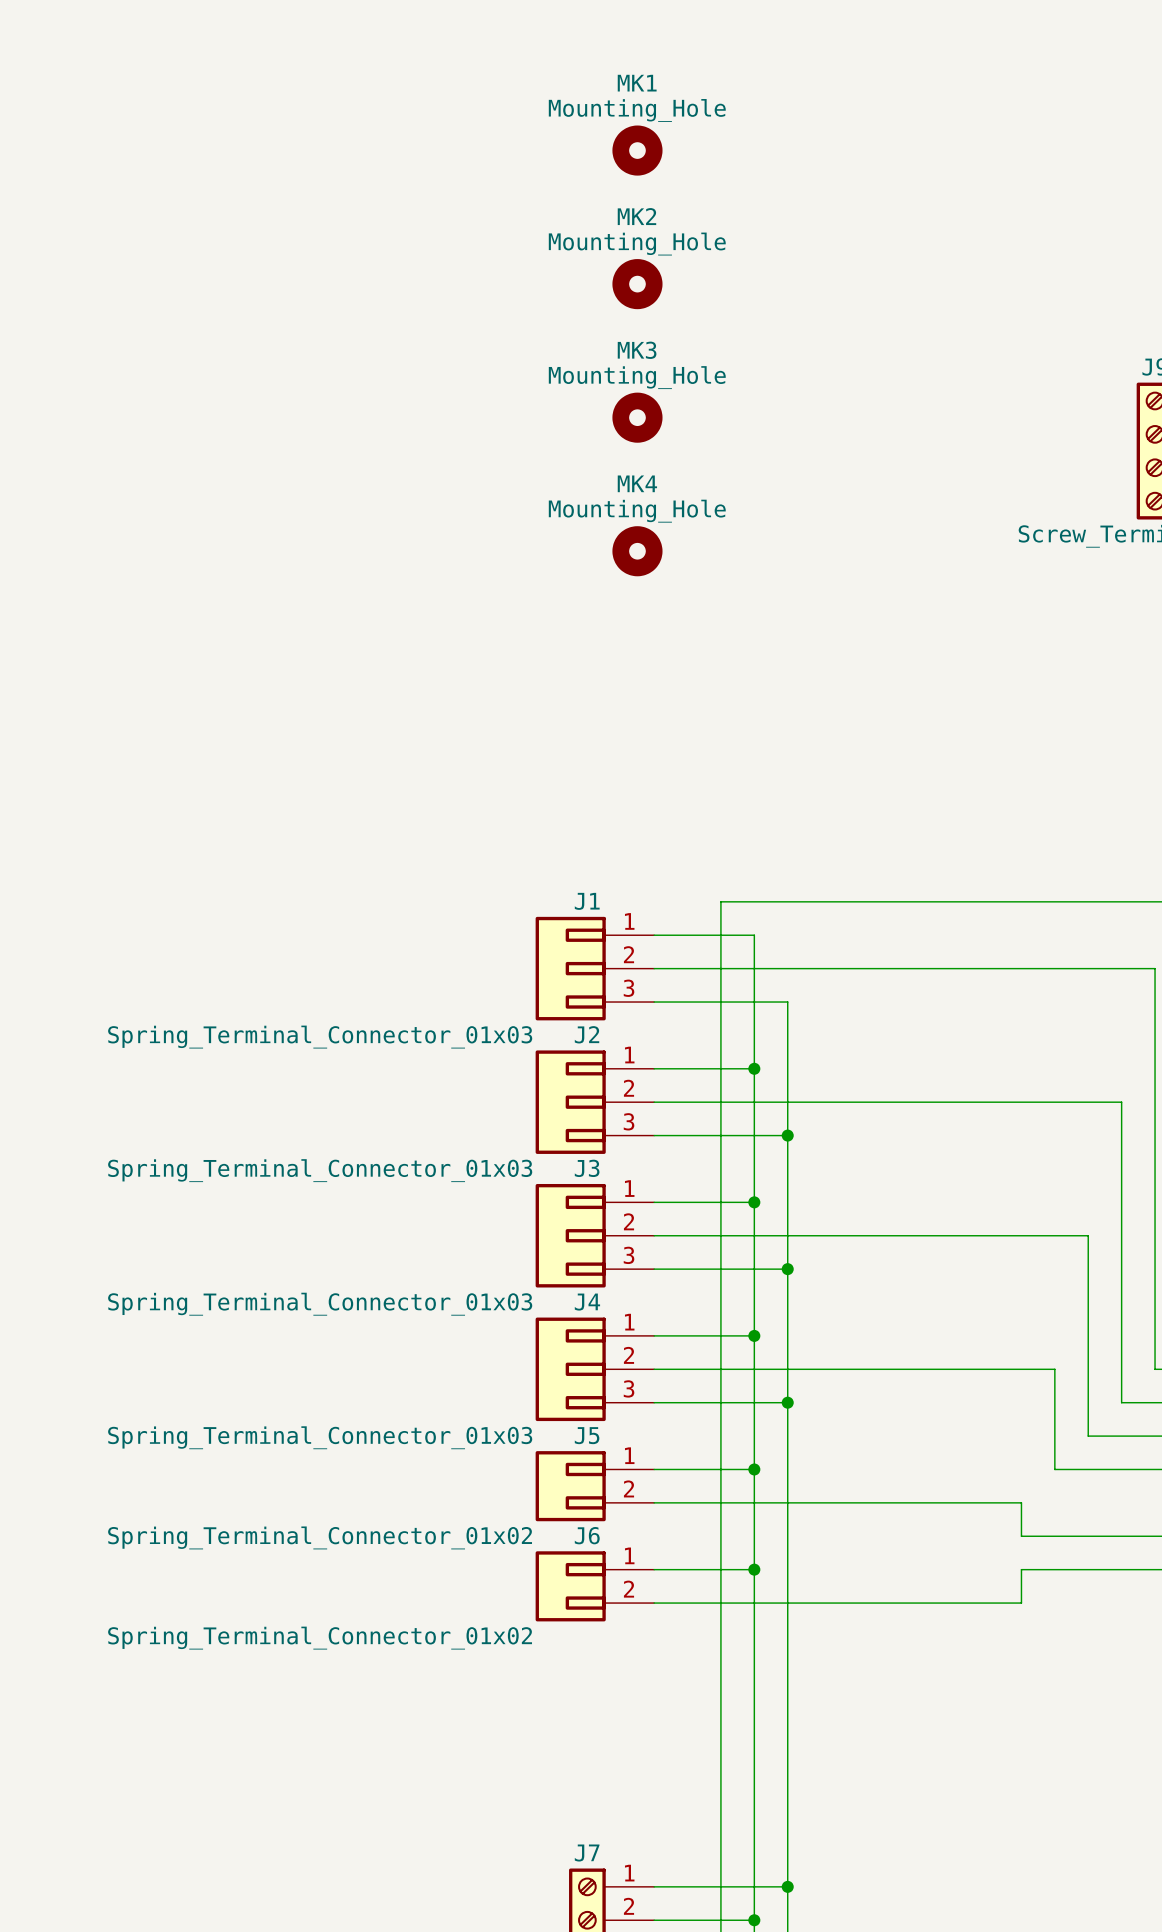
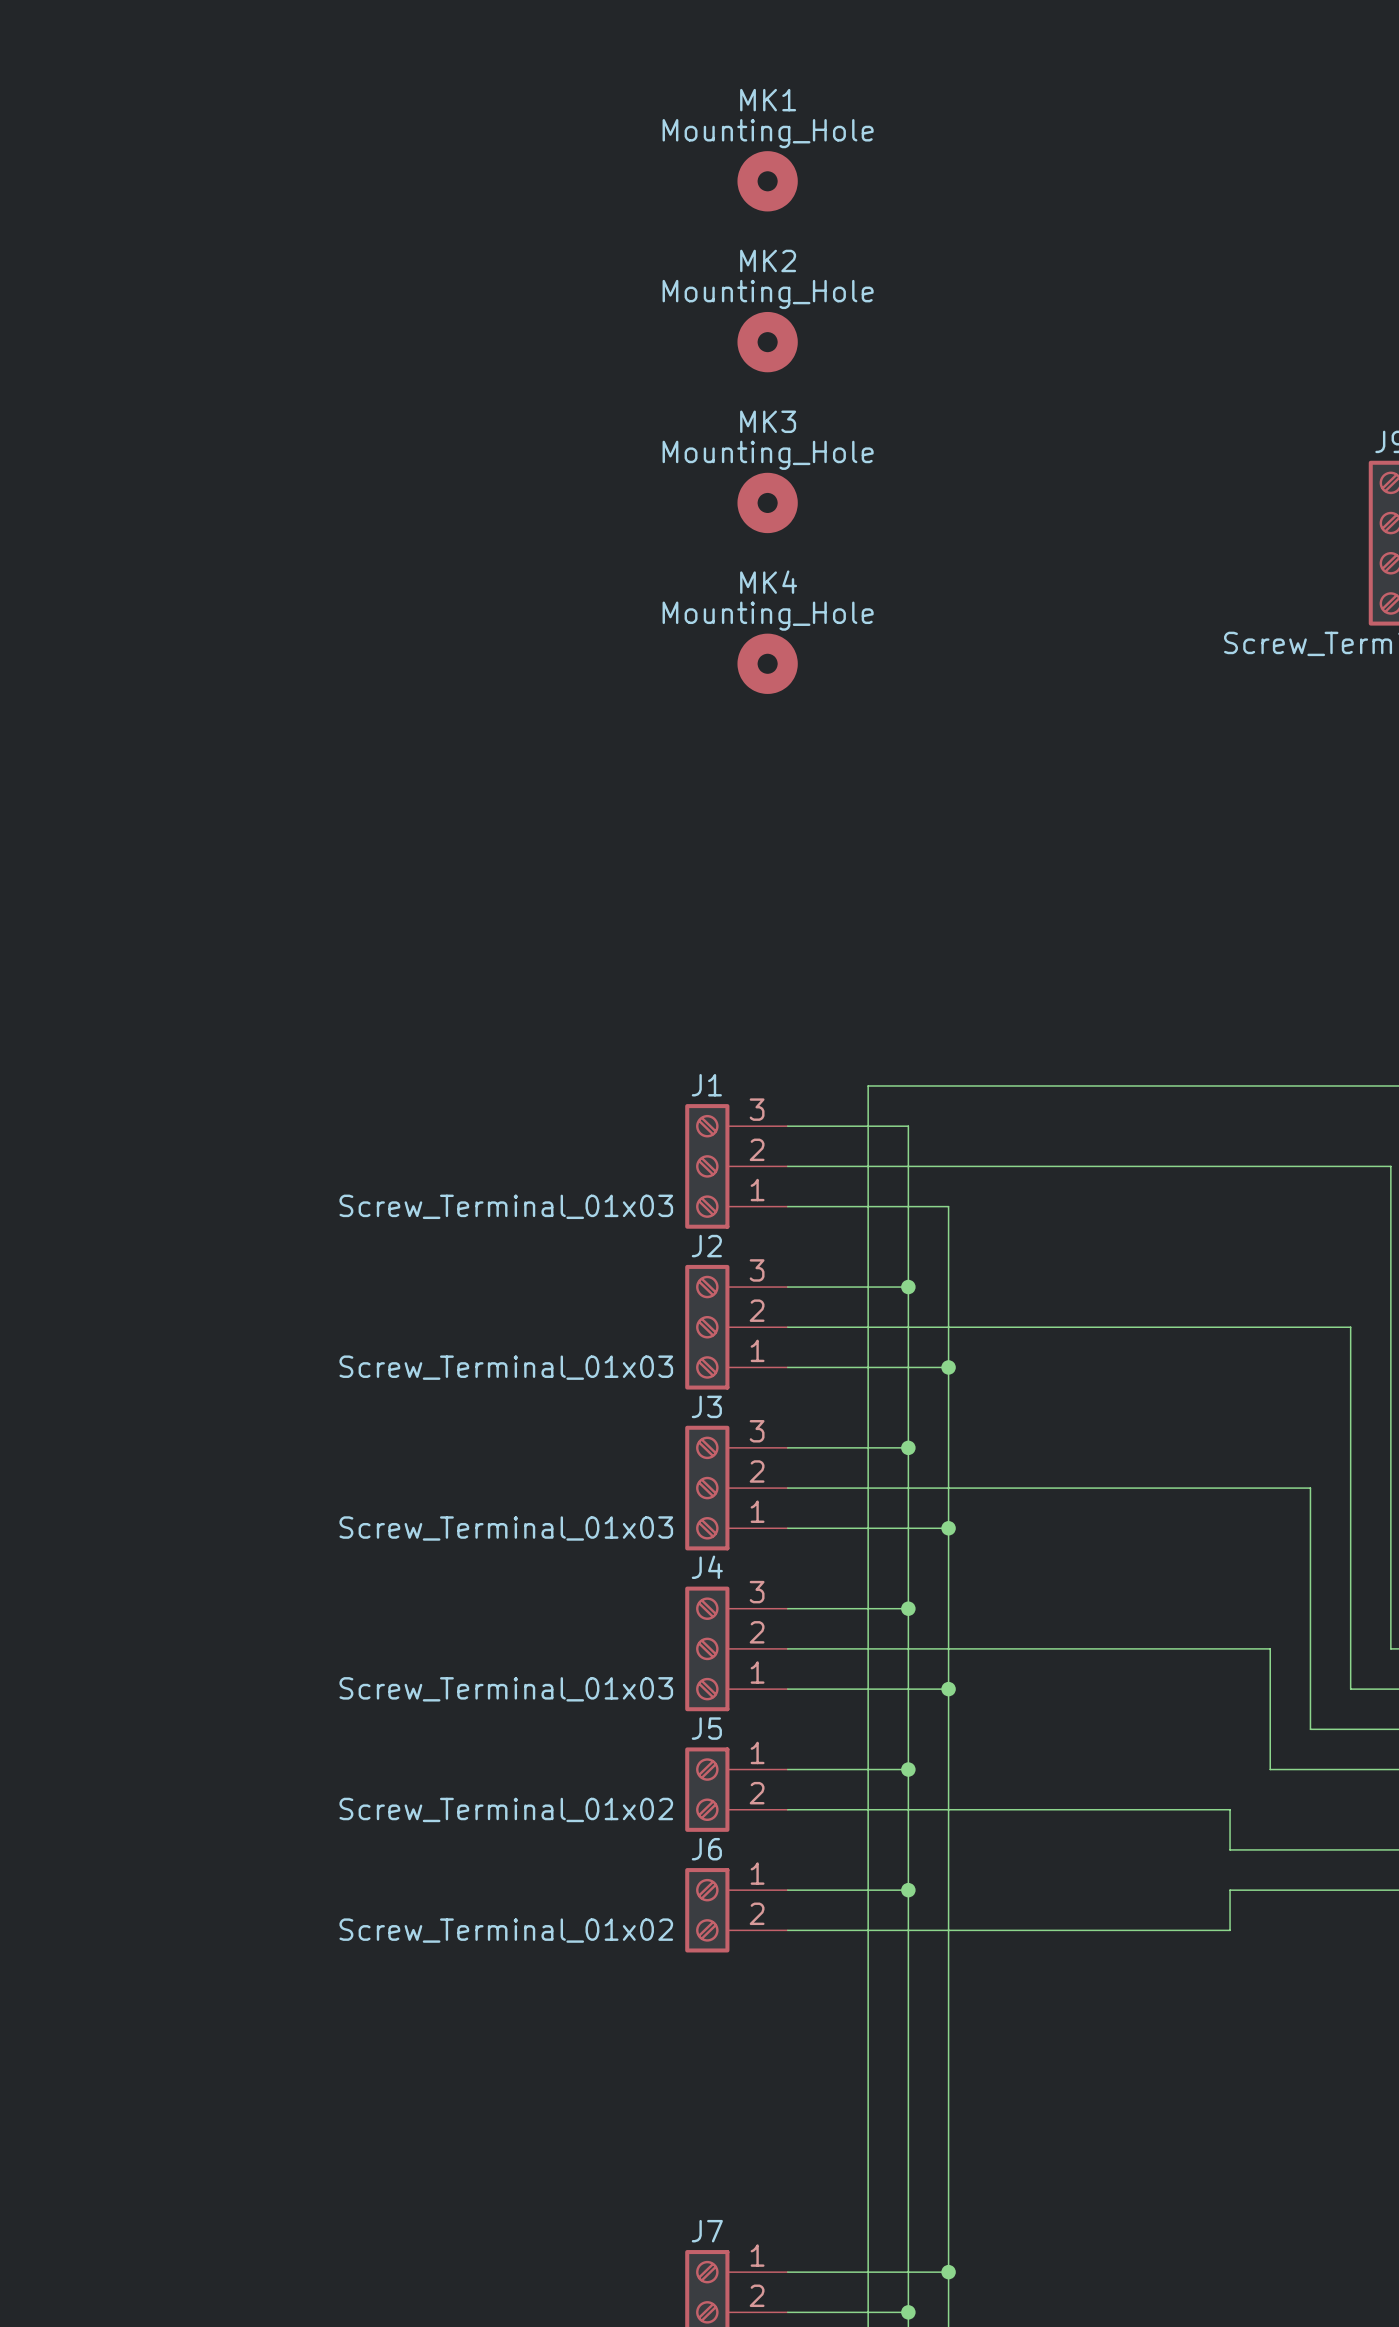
J1 symbol: [535, 916, 655, 1021] -> [685, 1104, 788, 1229]
J1 value: Spring_Terminal_Connector_01x03 (320, 1037) -> Screw_Terminal_01x03 (506, 1206)
J2 symbol: [535, 1050, 655, 1154] -> [685, 1264, 788, 1390]
J2 value: Spring_Terminal_Connector_01x03 (320, 1170) -> Screw_Terminal_01x03 (506, 1367)
J3 symbol: [535, 1183, 655, 1288] -> [685, 1425, 788, 1551]
J3 value: Spring_Terminal_Connector_01x03 (320, 1304) -> Screw_Terminal_01x03 (506, 1528)
J4 symbol: [535, 1317, 655, 1422] -> [685, 1586, 788, 1712]
J4 value: Spring_Terminal_Connector_01x03 (320, 1437) -> Screw_Terminal_01x03 (506, 1689)
J5 symbol: [535, 1451, 655, 1522] -> [685, 1747, 788, 1832]
J5 value: Spring_Terminal_Connector_01x02 (320, 1537) -> Screw_Terminal_01x02 (506, 1809)
J6 symbol: [535, 1551, 655, 1622] -> [685, 1868, 788, 1953]
J6 value: Spring_Terminal_Connector_01x02 (320, 1638) -> Screw_Terminal_01x02 (506, 1930)

